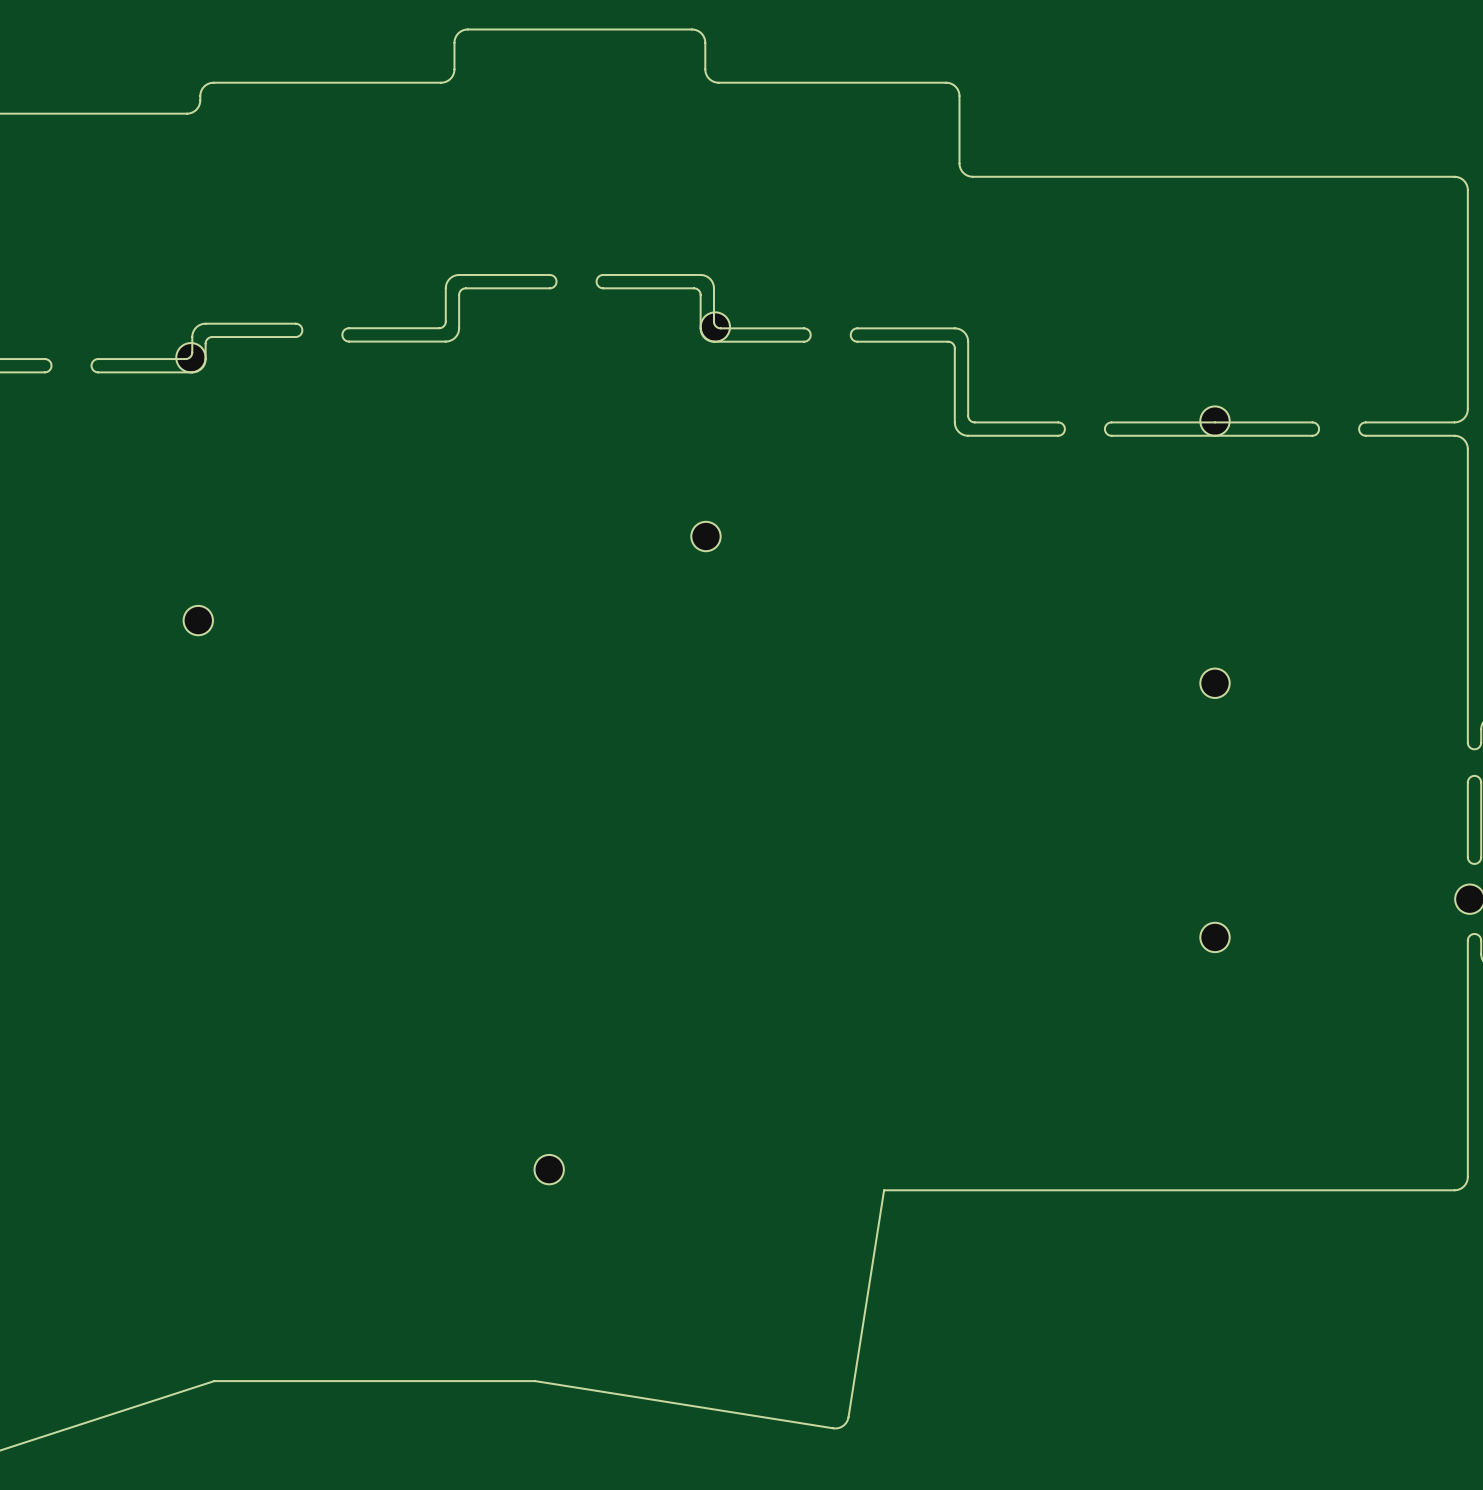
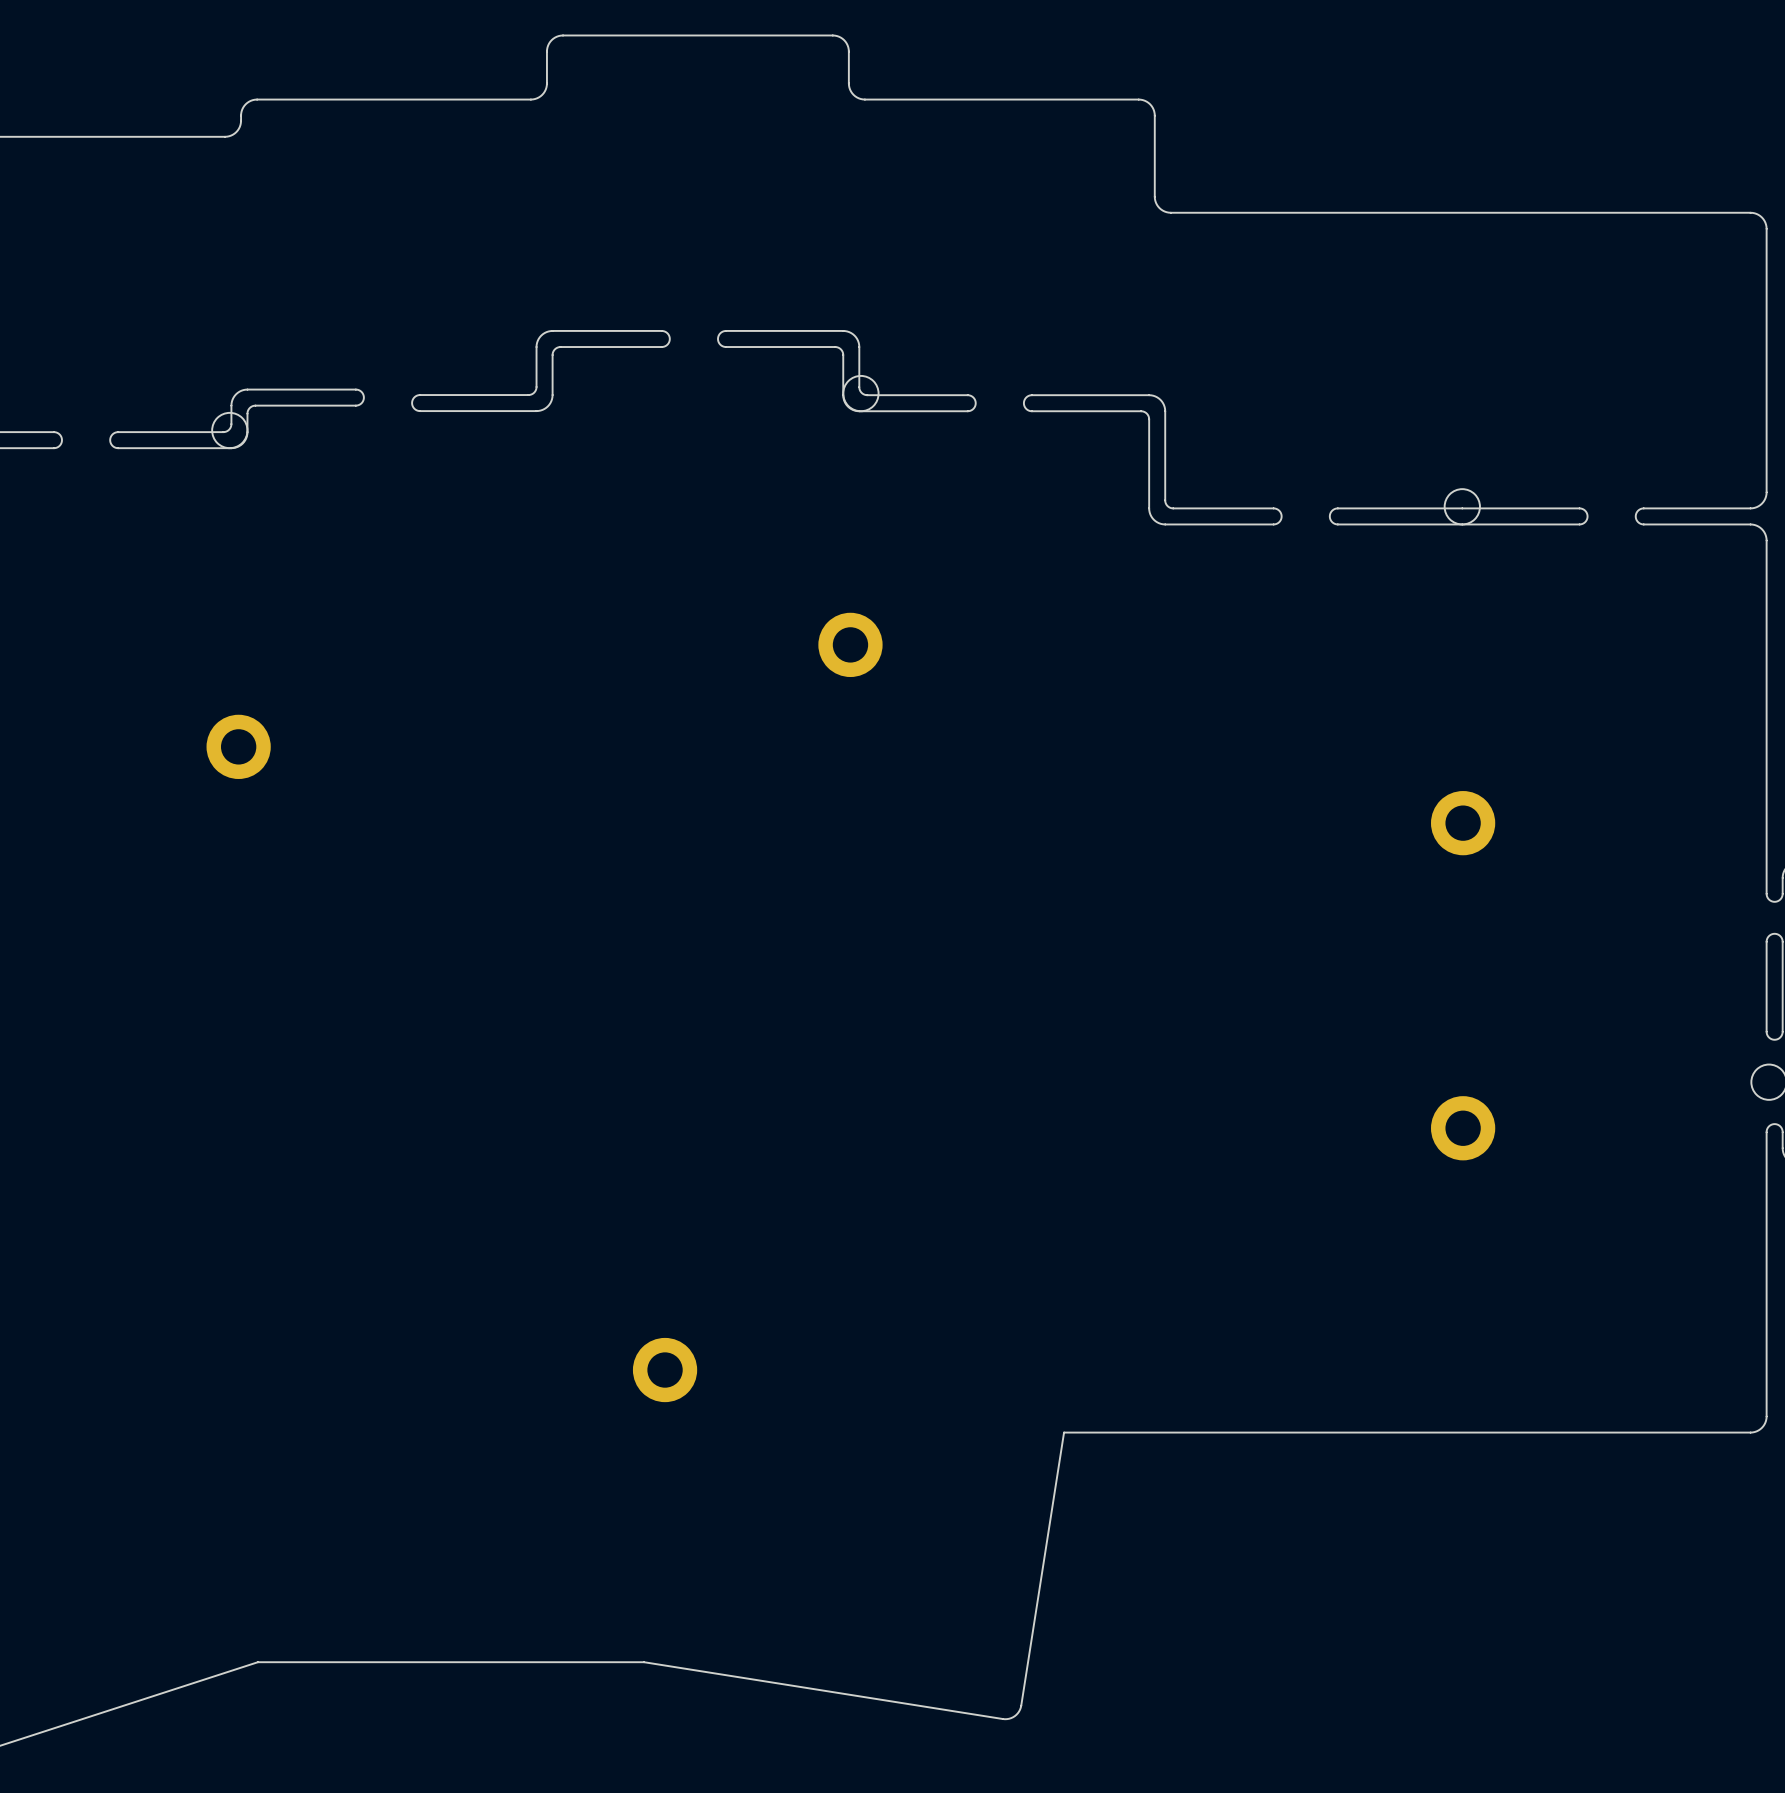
part footprint: [691, 521, 721, 552] -> [818, 612, 883, 678]
part footprint: [183, 605, 213, 636] -> [206, 714, 271, 779]
part footprint: [1200, 668, 1230, 698] -> [1430, 791, 1496, 856]
part footprint: [1200, 922, 1230, 953] -> [1430, 1096, 1496, 1161]
part: none -> (665, 1370)
part: (549, 1169) -> none

